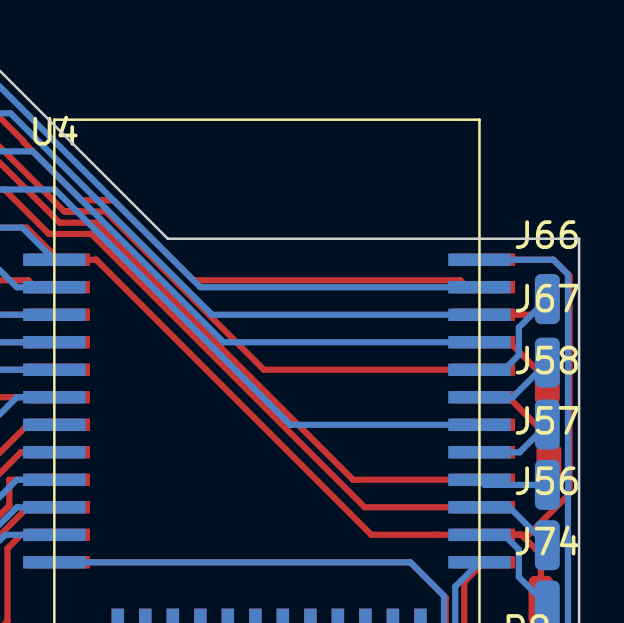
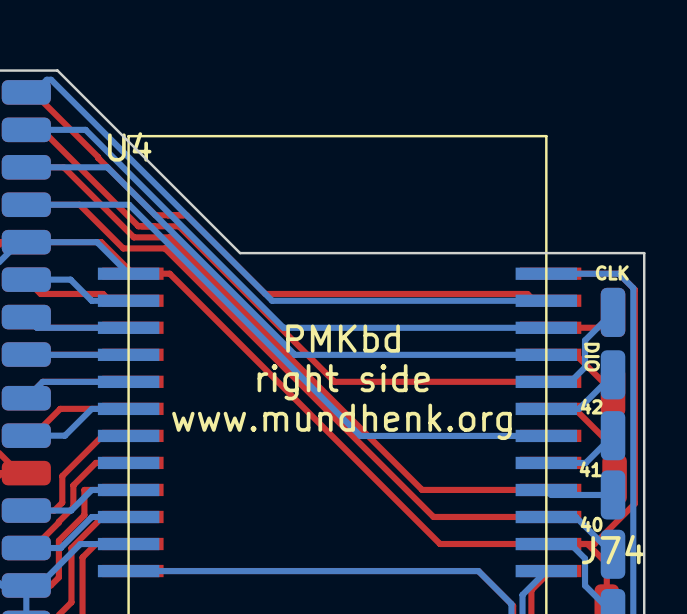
J66 name: J66 (546, 234) -> CLK (612, 272)
J67 name: J67 (547, 298) -> DIO (592, 357)
text: none -> PMKbd (343, 338)
J58 name: J58 (546, 360) -> 42 (591, 406)
text: none -> right side (343, 382)
text: none -> www.mundhenk.org (341, 421)
J57 name: J57 (547, 420) -> 41 (590, 469)
J56 name: J56 (546, 480) -> 40 (591, 524)

